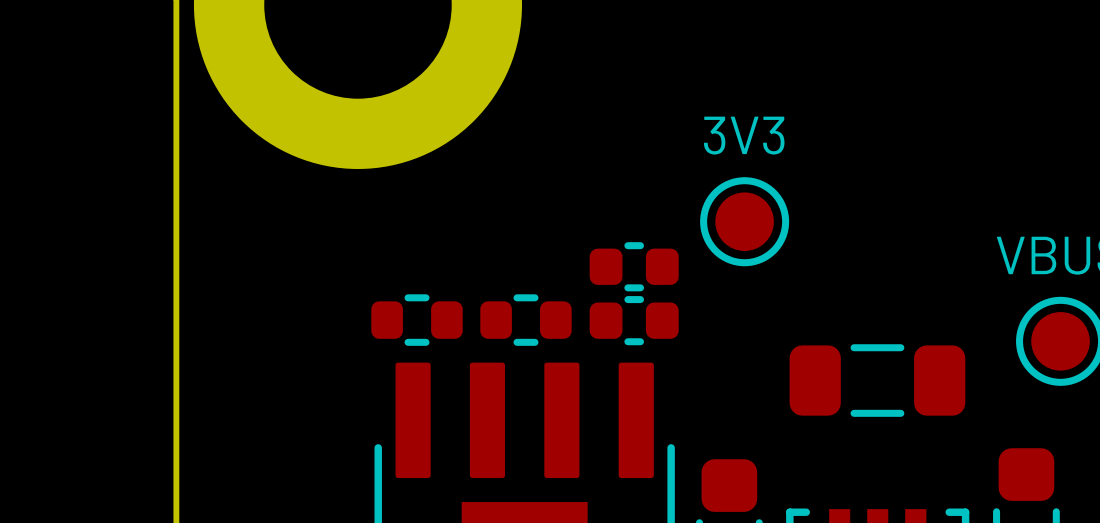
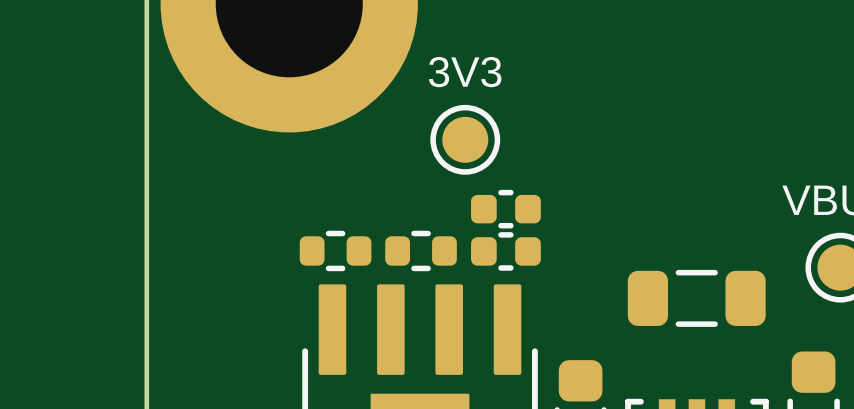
part position: (744, 221) -> (465, 139)

